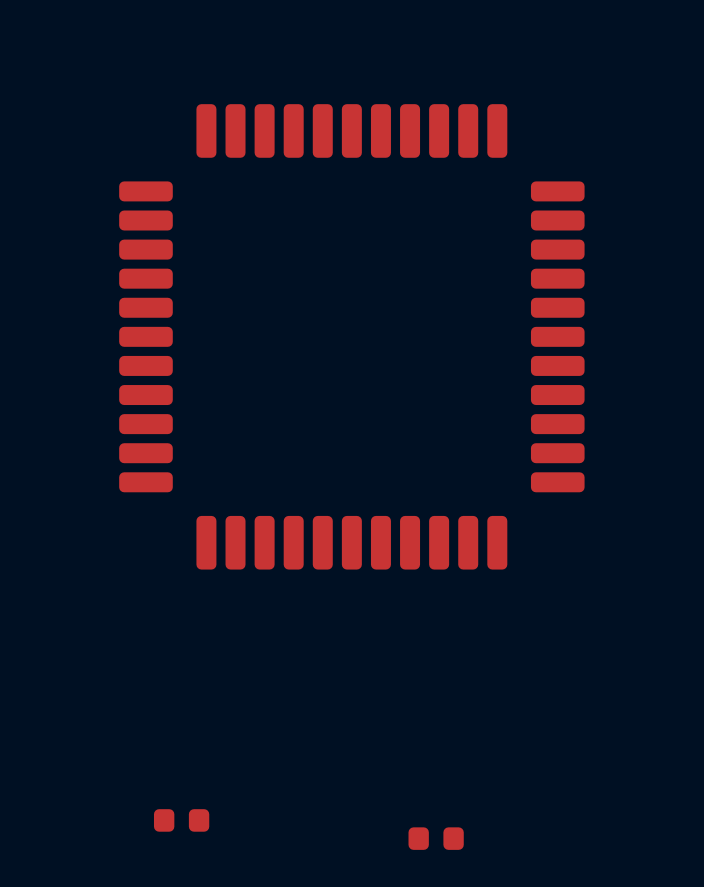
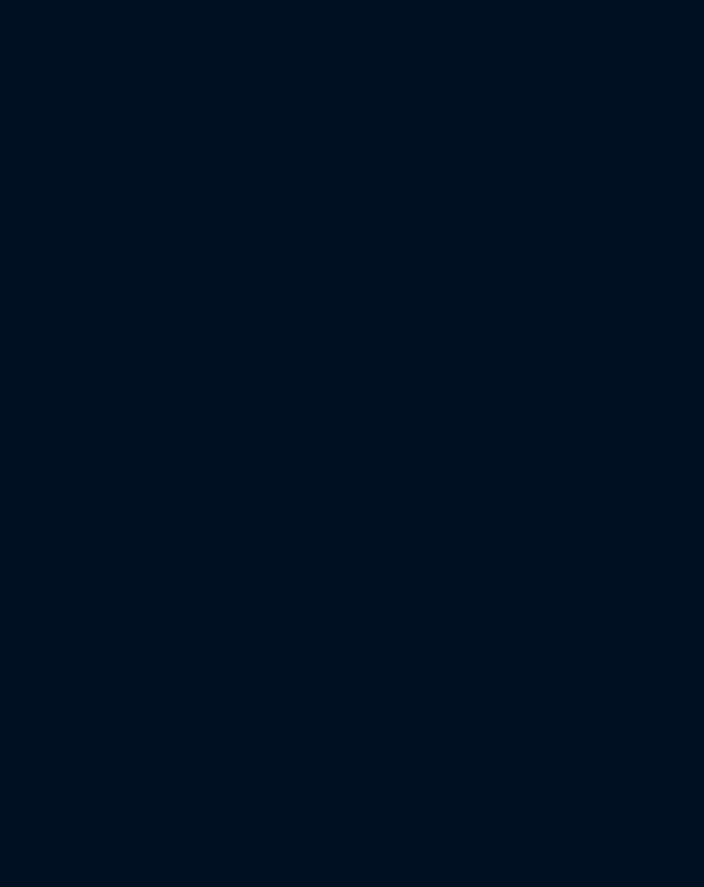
part: (351, 336) -> none
part: (181, 820) -> none
part: (436, 838) -> none

